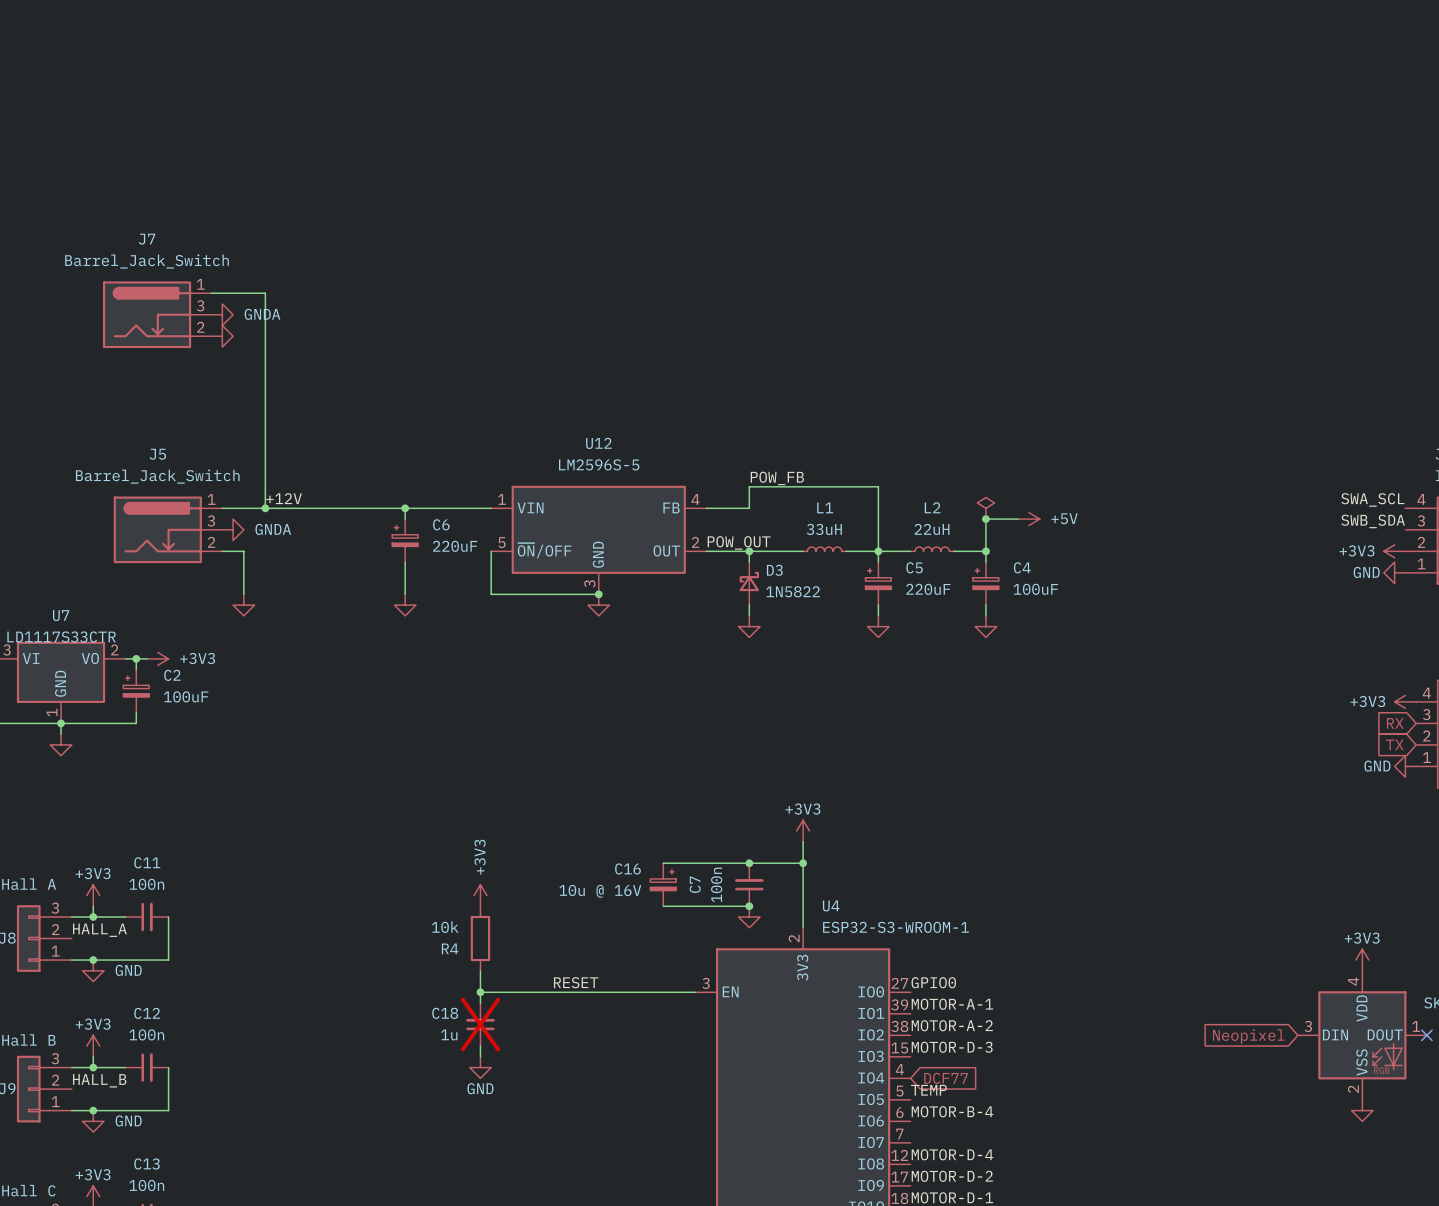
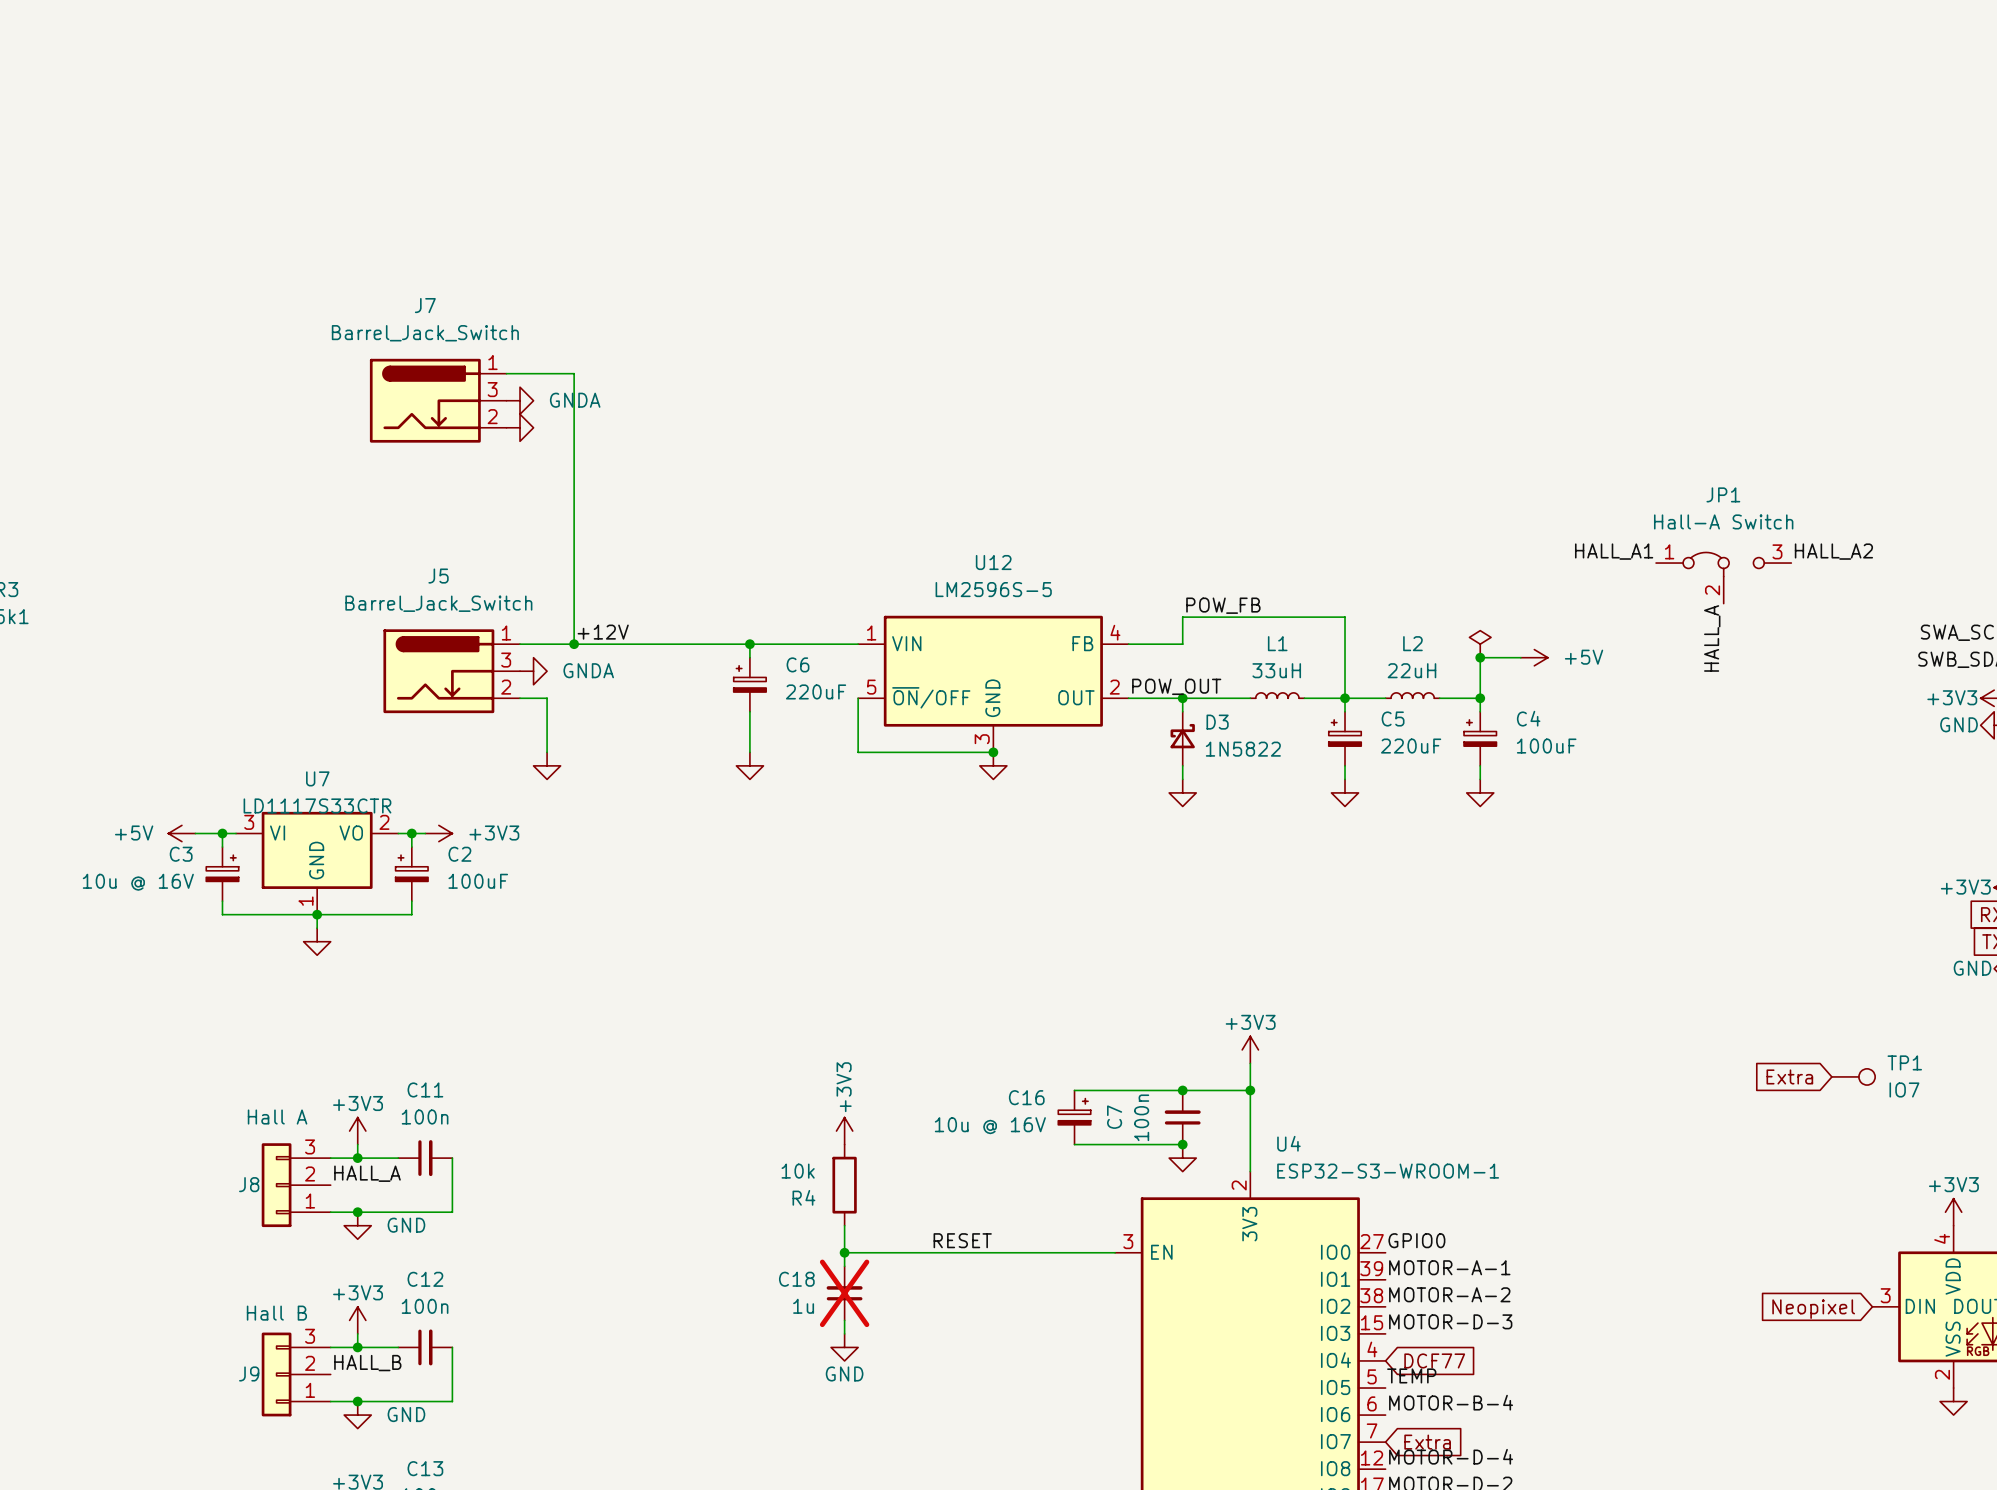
label: none -> HALL_A1 (1614, 551)
label: none -> HALL_A2 (1833, 551)
JP1: none -> Hall-A Switch (1723, 578)
label: none -> HALL_A (1712, 638)
global label: none -> Extra (1789, 1076)
TP1: none -> IO7 (1853, 1076)
global label: none -> Extra (1427, 1442)

